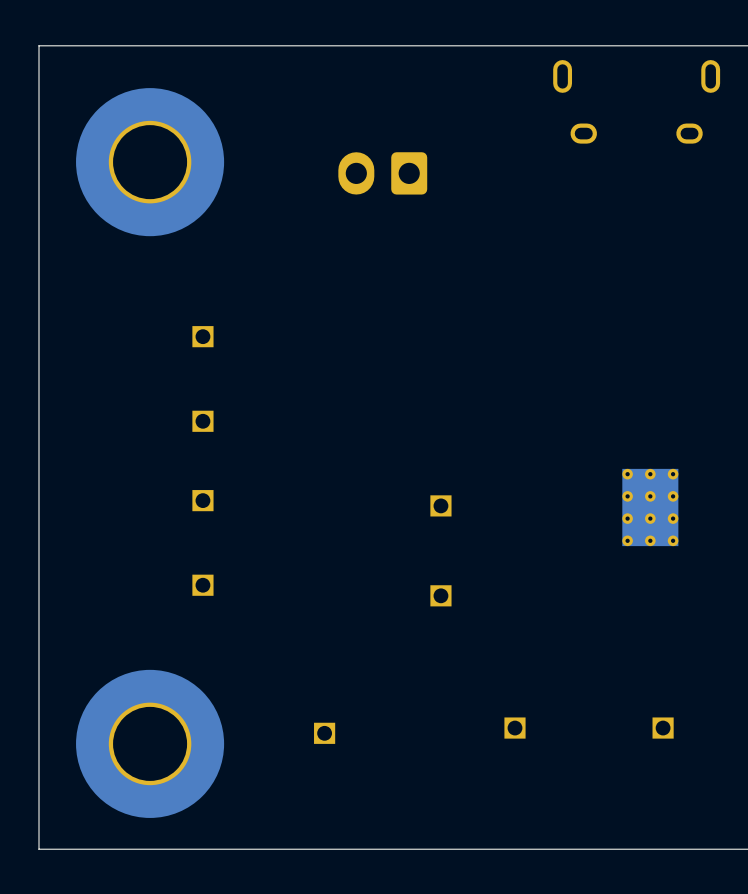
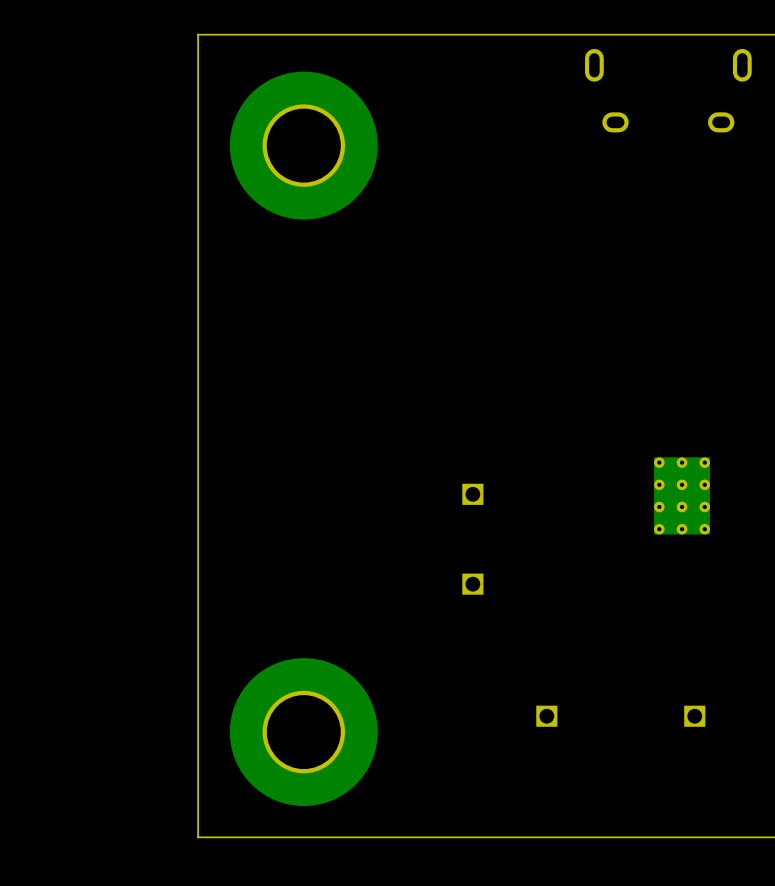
board edge: (165, 45) (39, 45) (39, 849) (165, 849) -> (198, 34) (198, 837)
part position: (150, 162) -> (303, 145)
part: (382, 173) -> none
part: (202, 336) -> none
part: (202, 421) -> none
part: (202, 500) -> none
part: (202, 585) -> none
part: (324, 733) -> none
part position: (150, 743) -> (303, 732)

